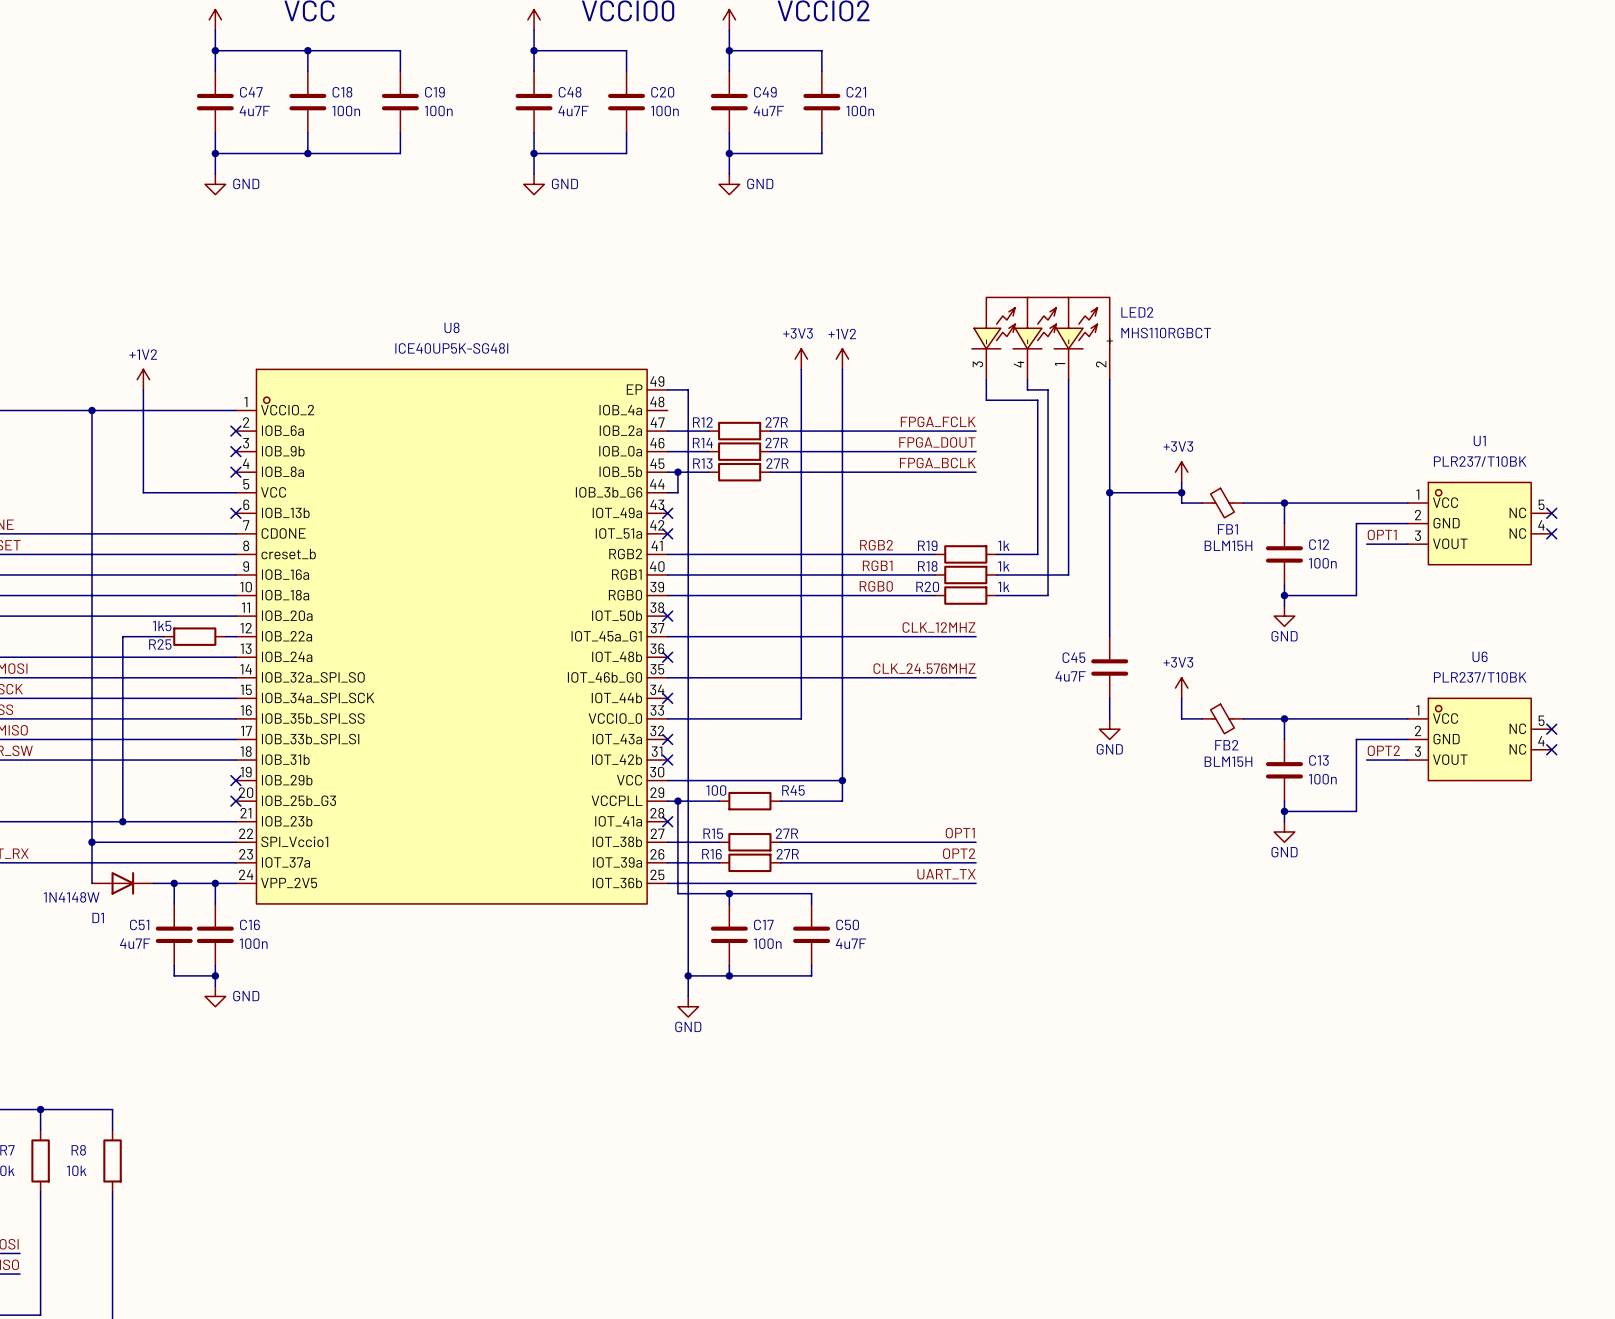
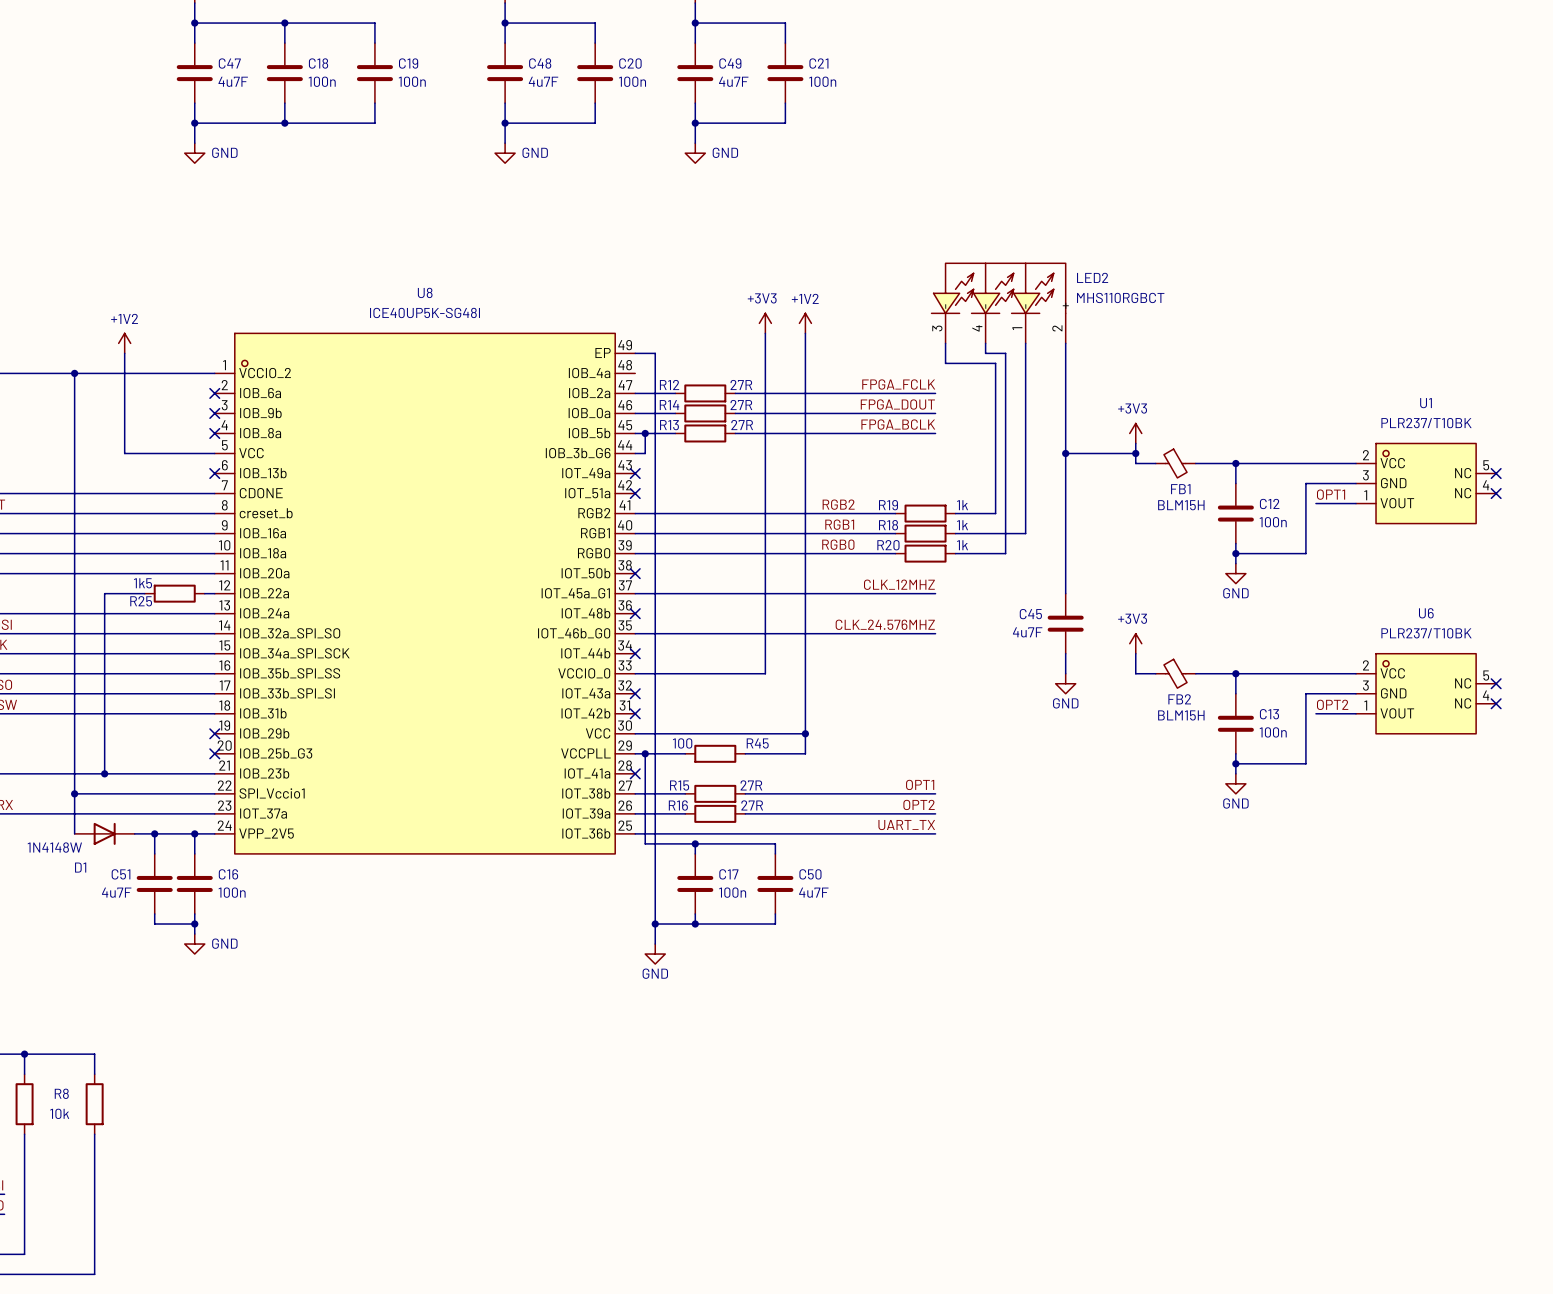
U1 pin number: 1 (1417, 494) -> 2 (1365, 455)
U1 pin number: 2 (1418, 515) -> 3 (1365, 475)
U1 pin number: 3 (1417, 535) -> 1 (1365, 495)
U6 pin number: 1 (1417, 710) -> 2 (1365, 665)
U6 pin number: 2 (1418, 730) -> 3 (1365, 685)
U6 pin number: 3 (1417, 751) -> 1 (1365, 705)

